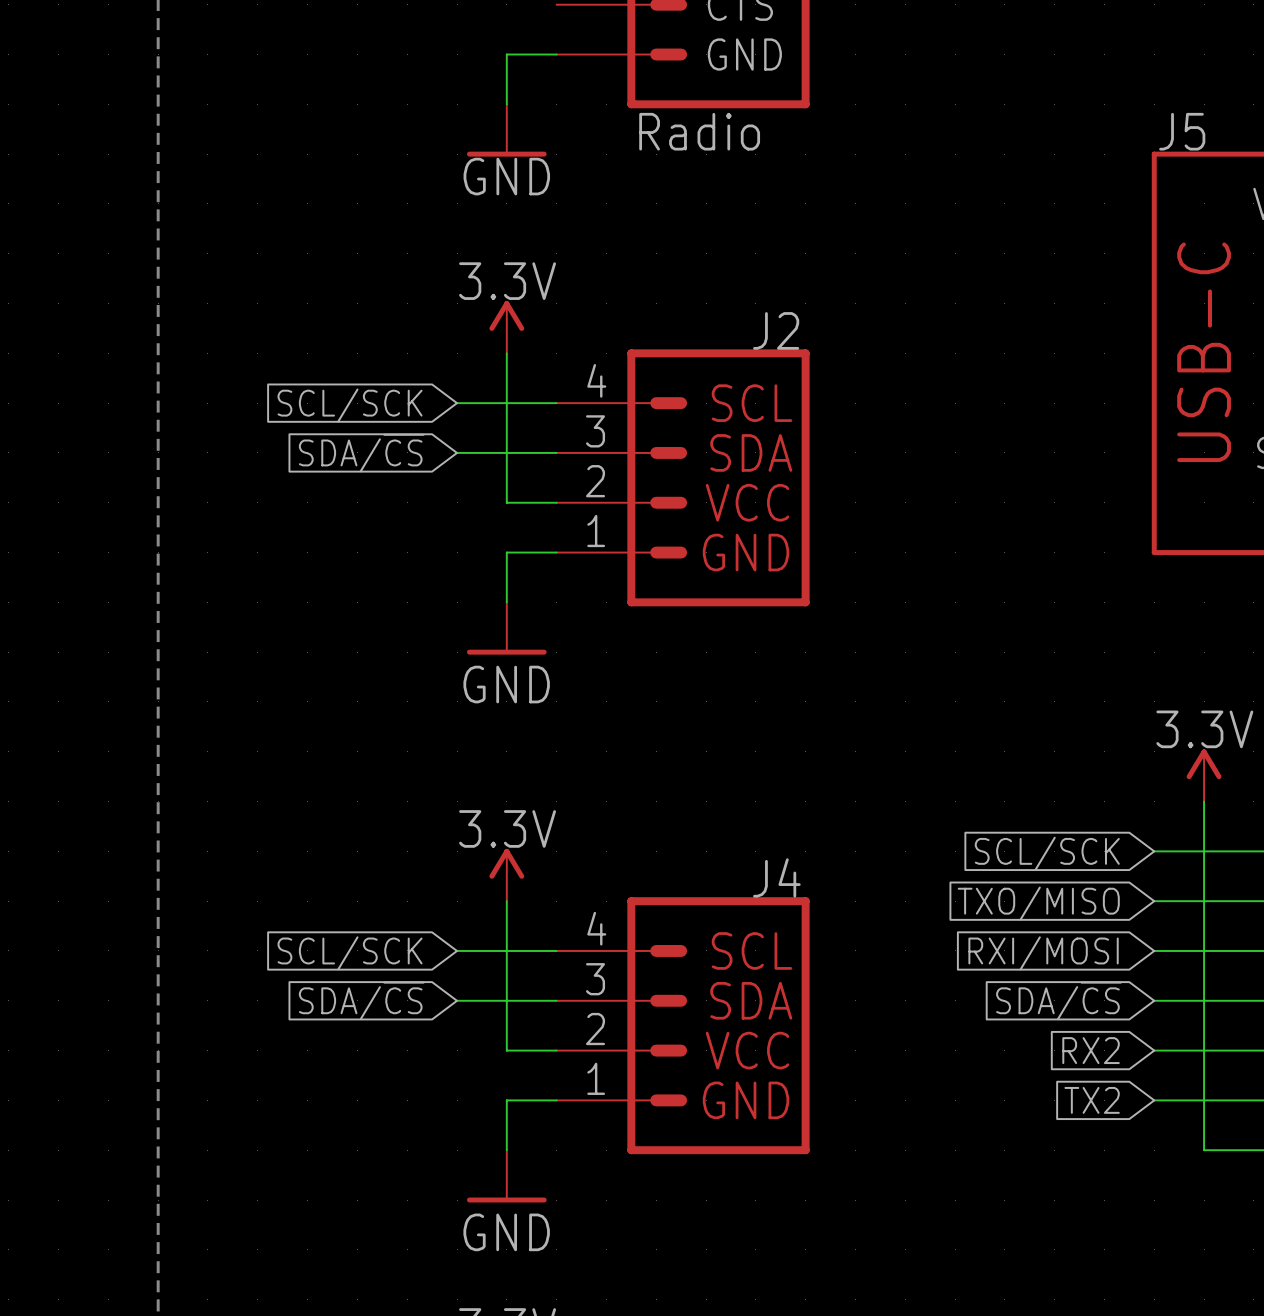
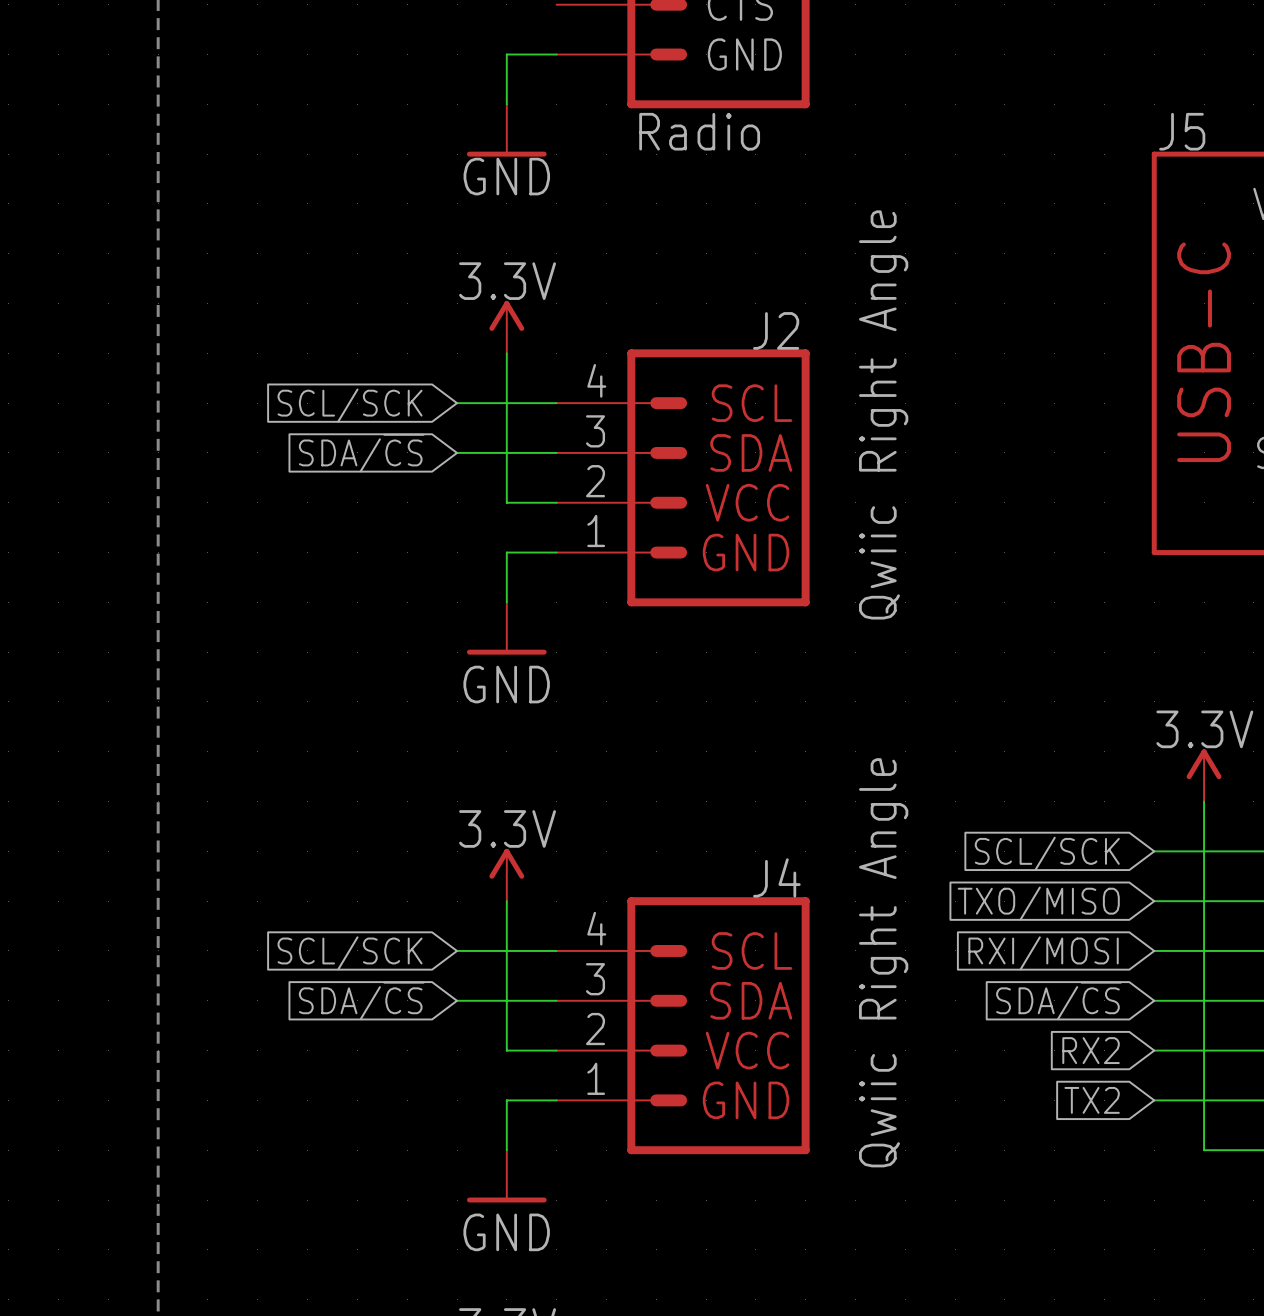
J2 value: none -> Qwiic Right Angle (883, 414)
J4 value: none -> Qwiic Right Angle (883, 962)

